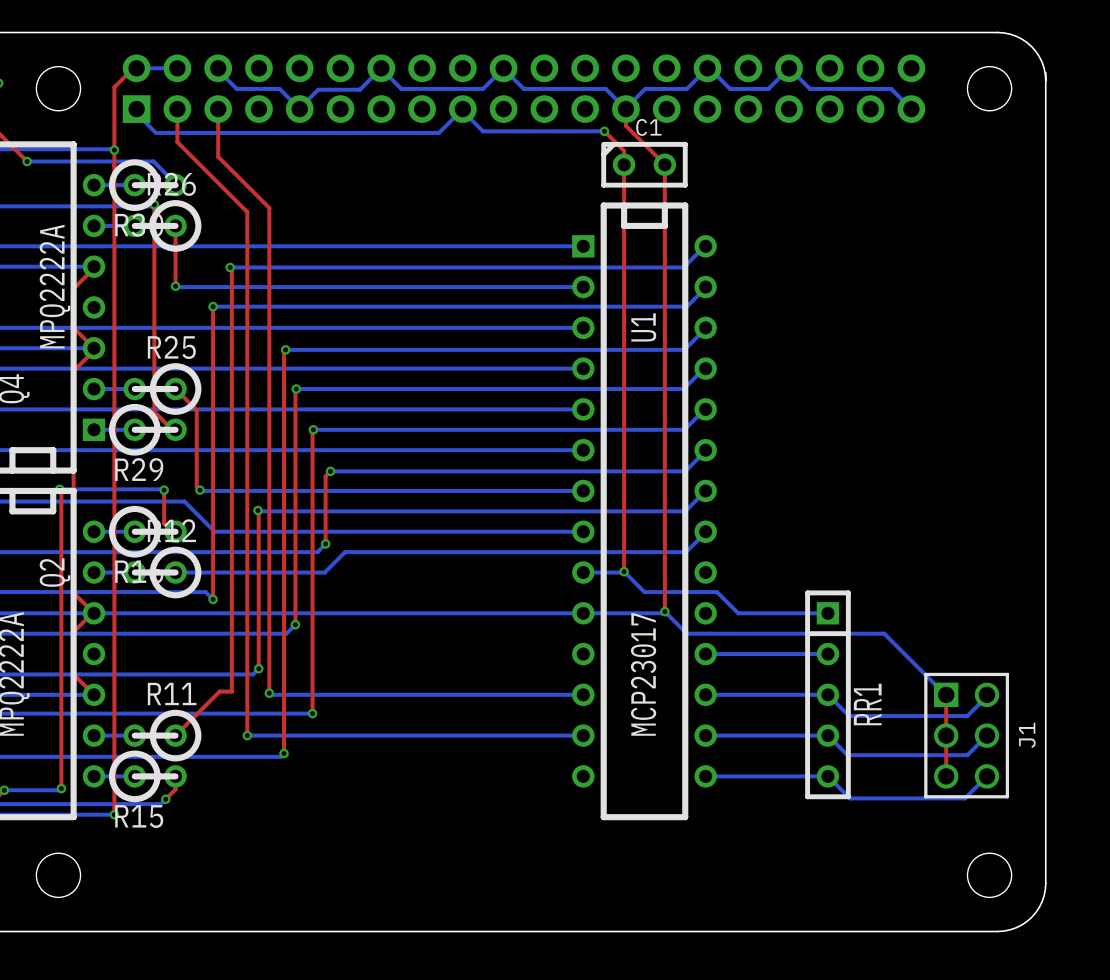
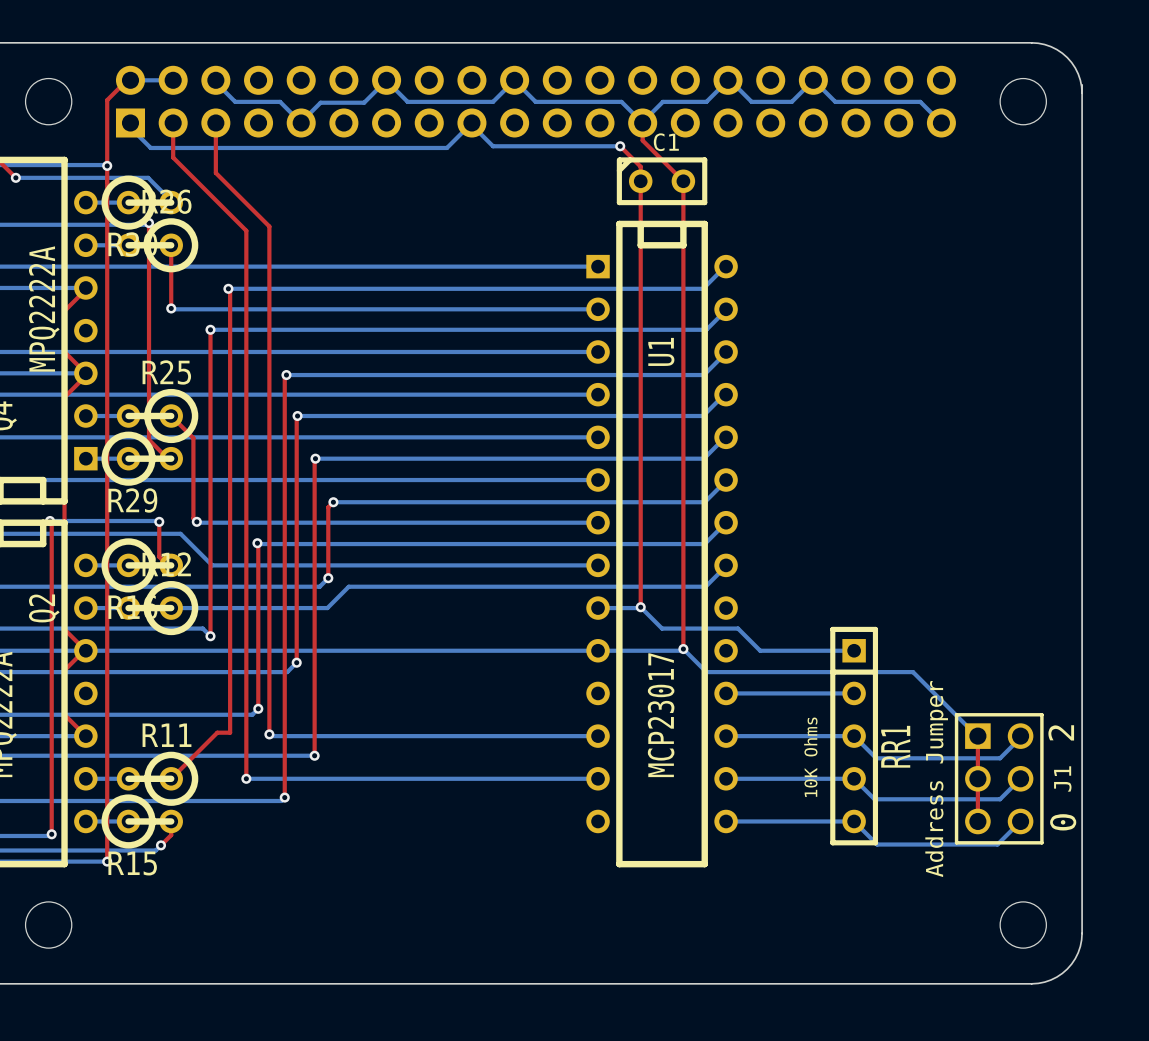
text: none -> 2 (1061, 732)
RR1 value: none -> 10K Ohms (810, 757)
J1 value: none -> Address Jumper (936, 779)
text: none -> 0 (1063, 822)

